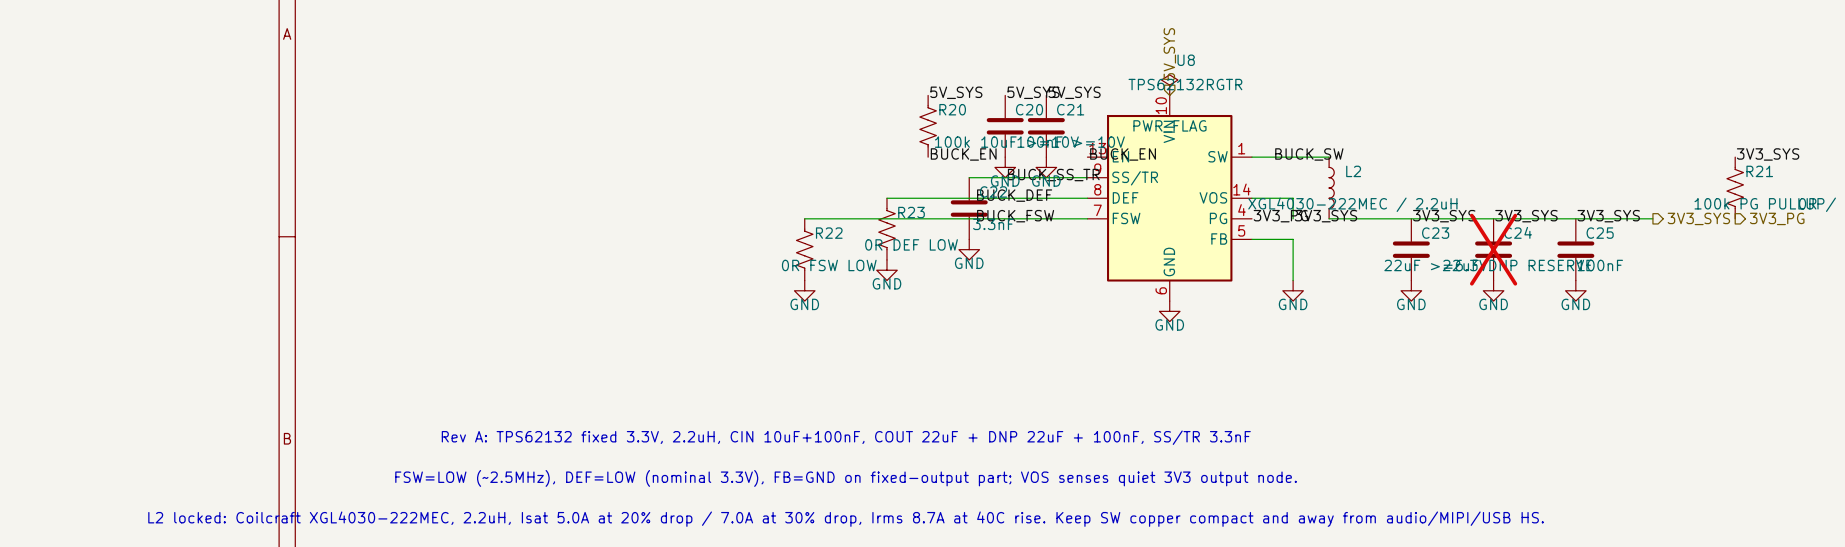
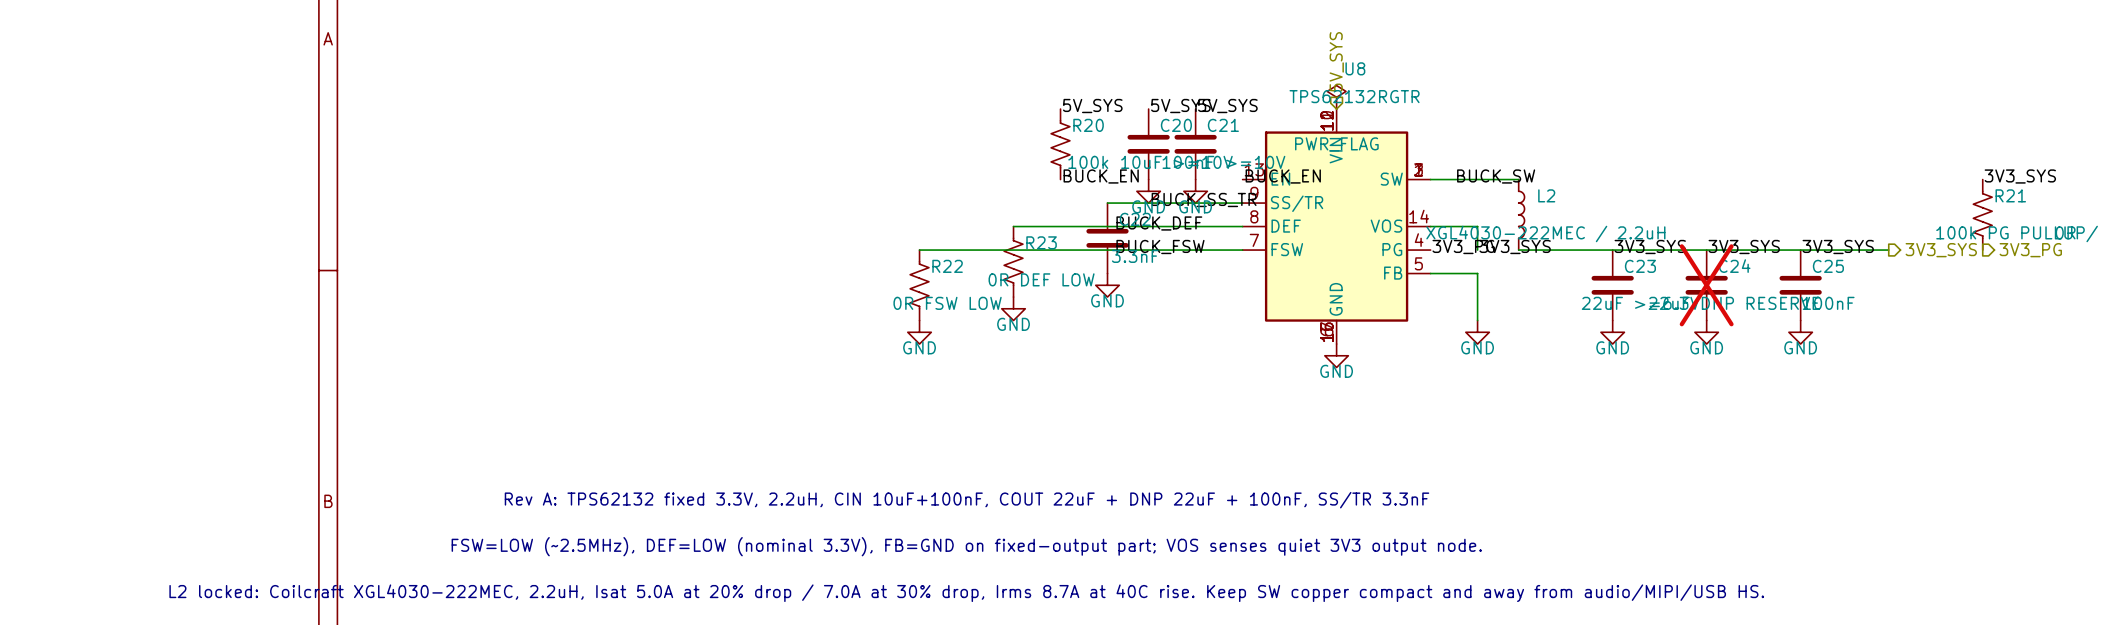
U8 symbol: [1087, 95, 1252, 302] -> [1242, 109, 1431, 345]

